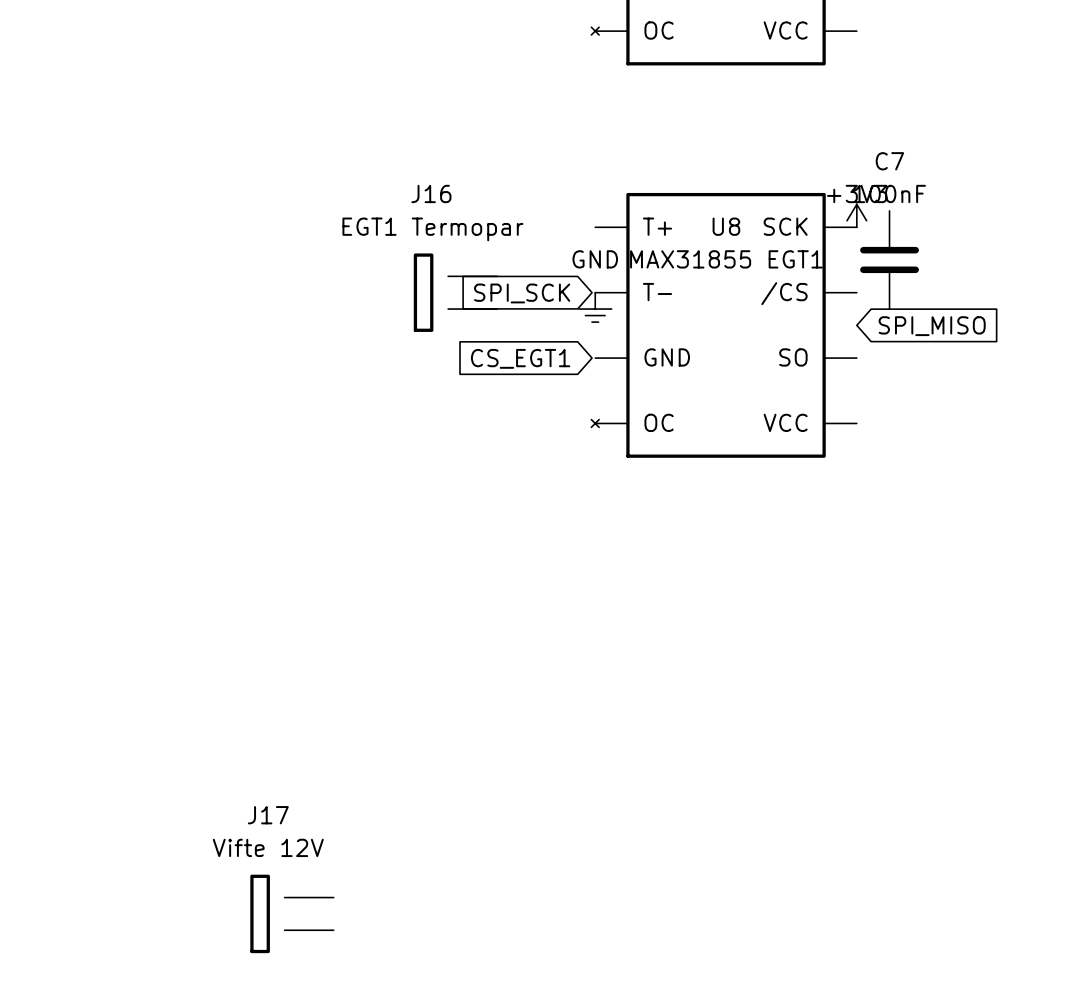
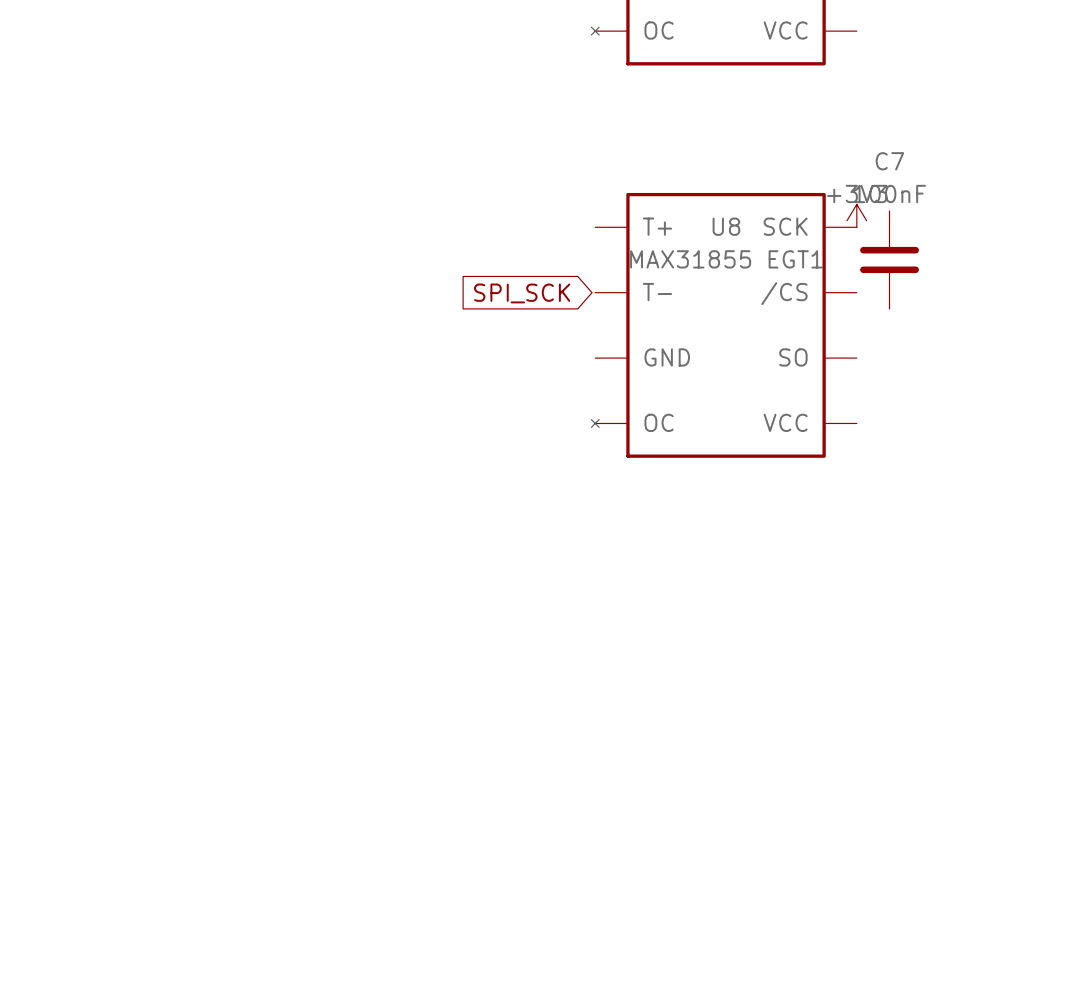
J16: EGT1 Termopar (455, 292) -> none
power symbol: GND (595, 307) -> none
global label: SPI_MISO (932, 326) -> none
global label: CS_EGT1 (520, 358) -> none
J17: Vifte 12V (291, 913) -> none

